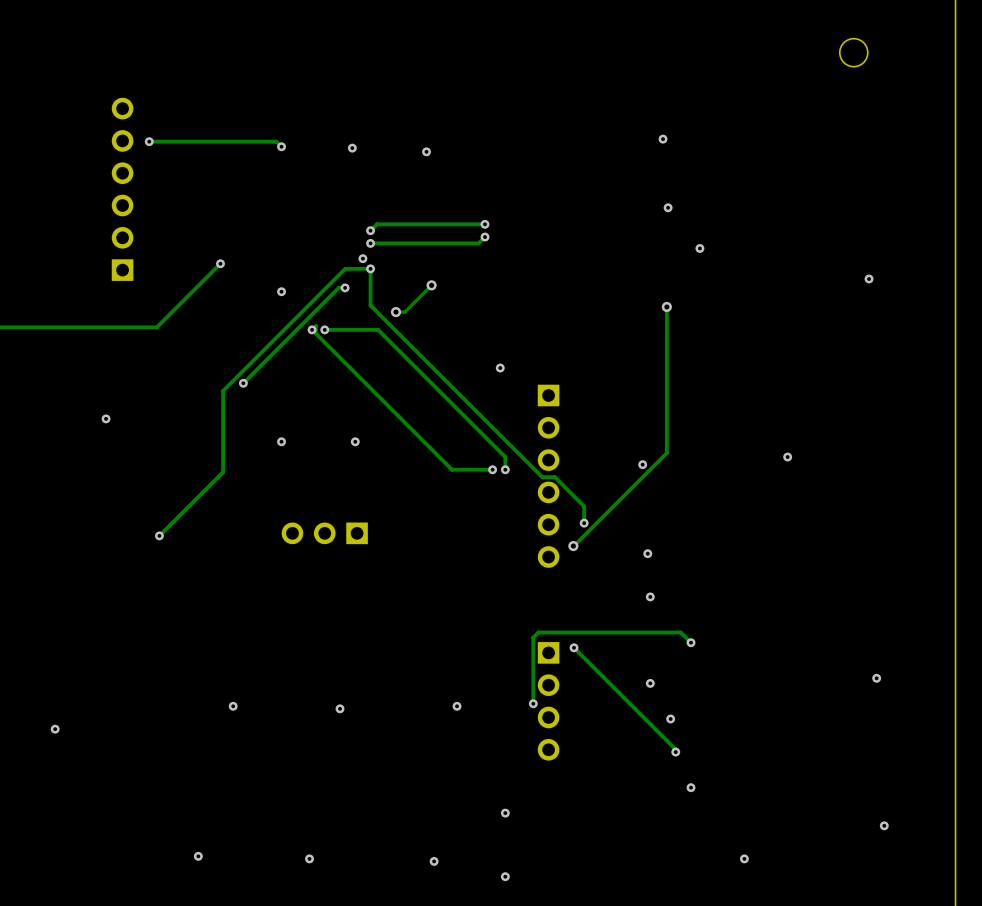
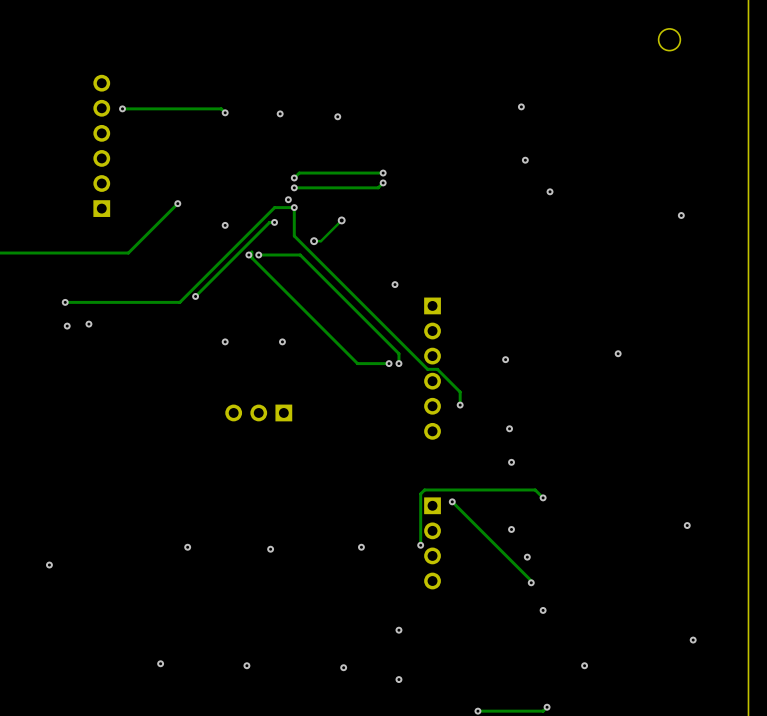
track: (666, 306) (666, 453) (573, 546) -> none
via: (666, 306) -> none
via: none -> (65, 302)
track: (223, 390) (223, 472) (159, 535) -> (179, 302) (65, 302)
via: none -> (67, 326)
via: (159, 535) -> none
via: (573, 546) -> none

